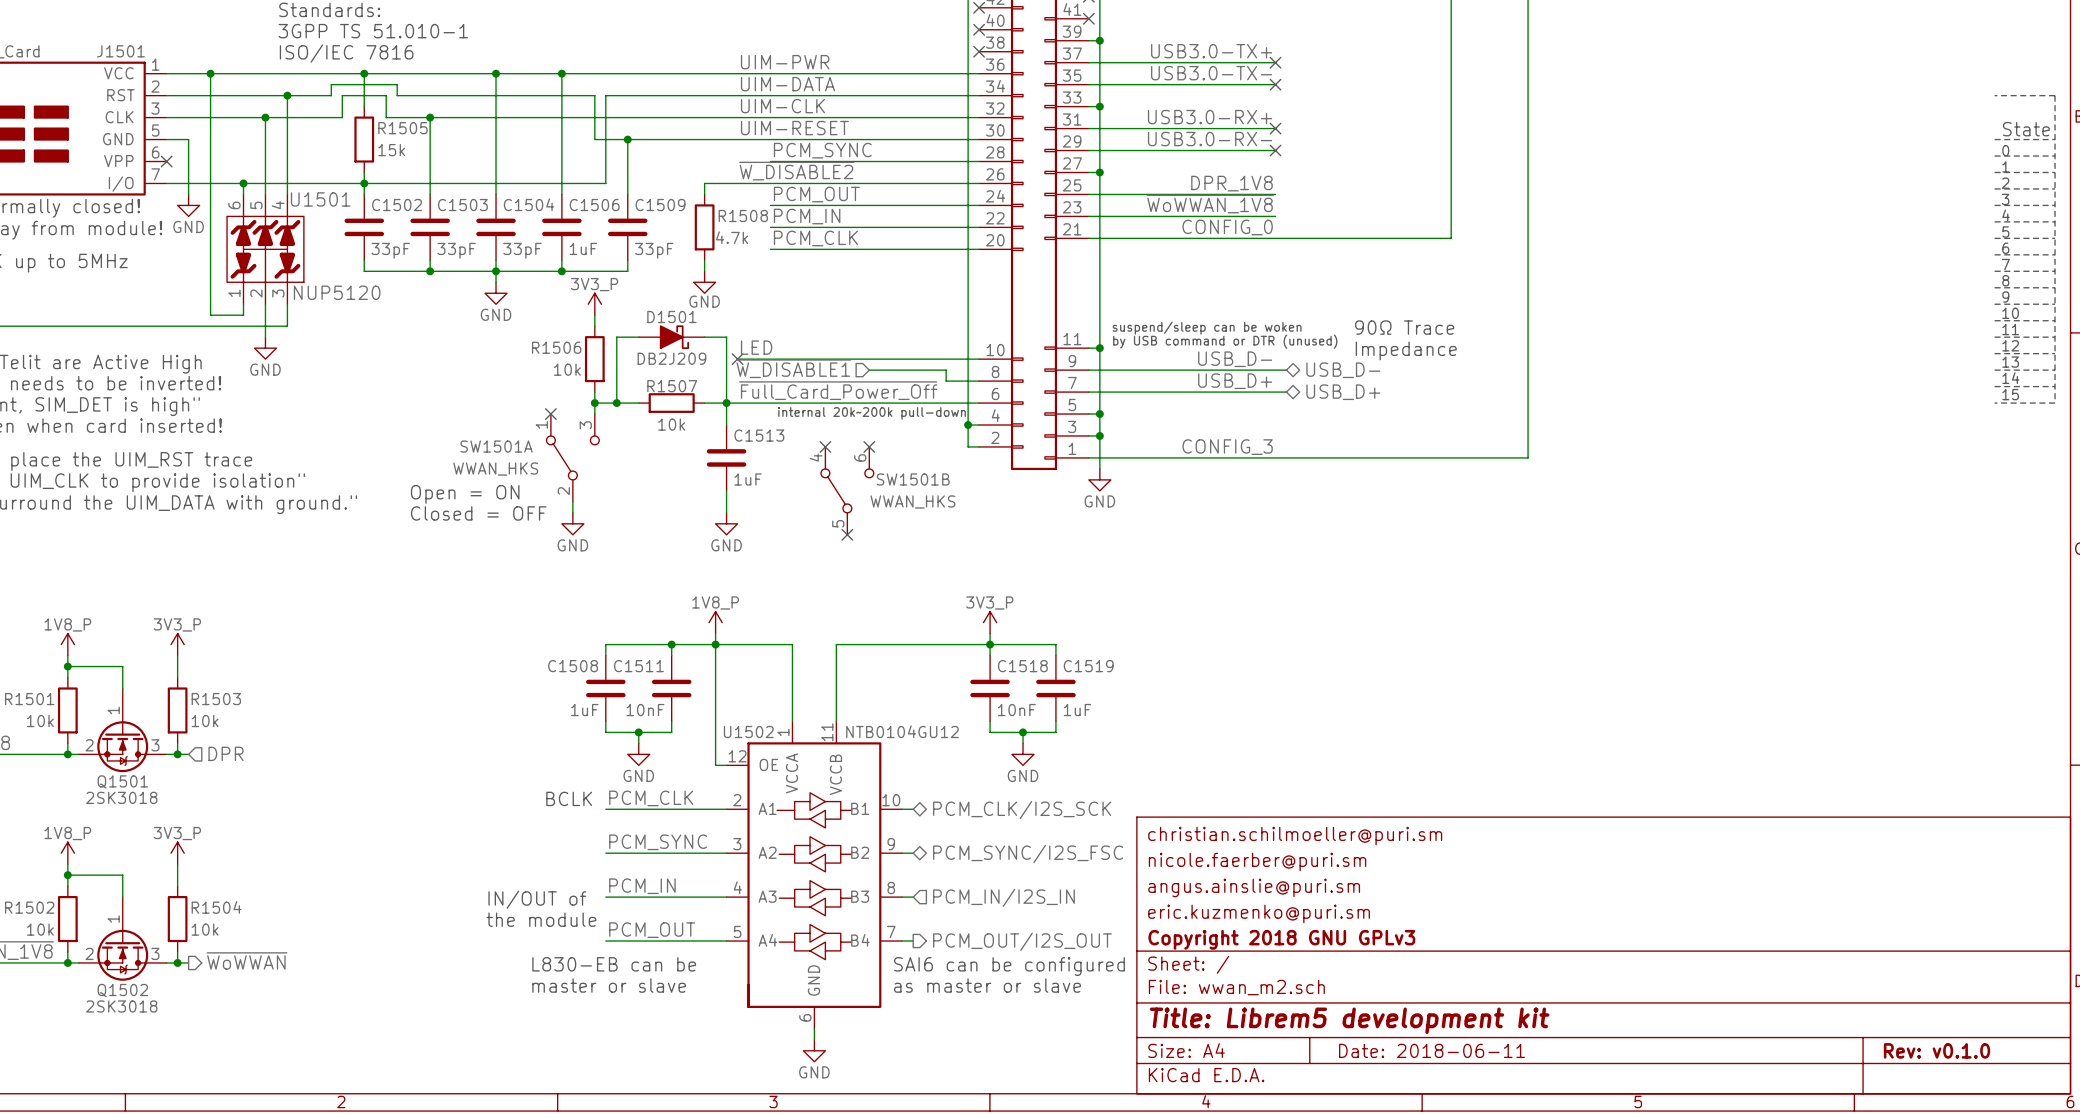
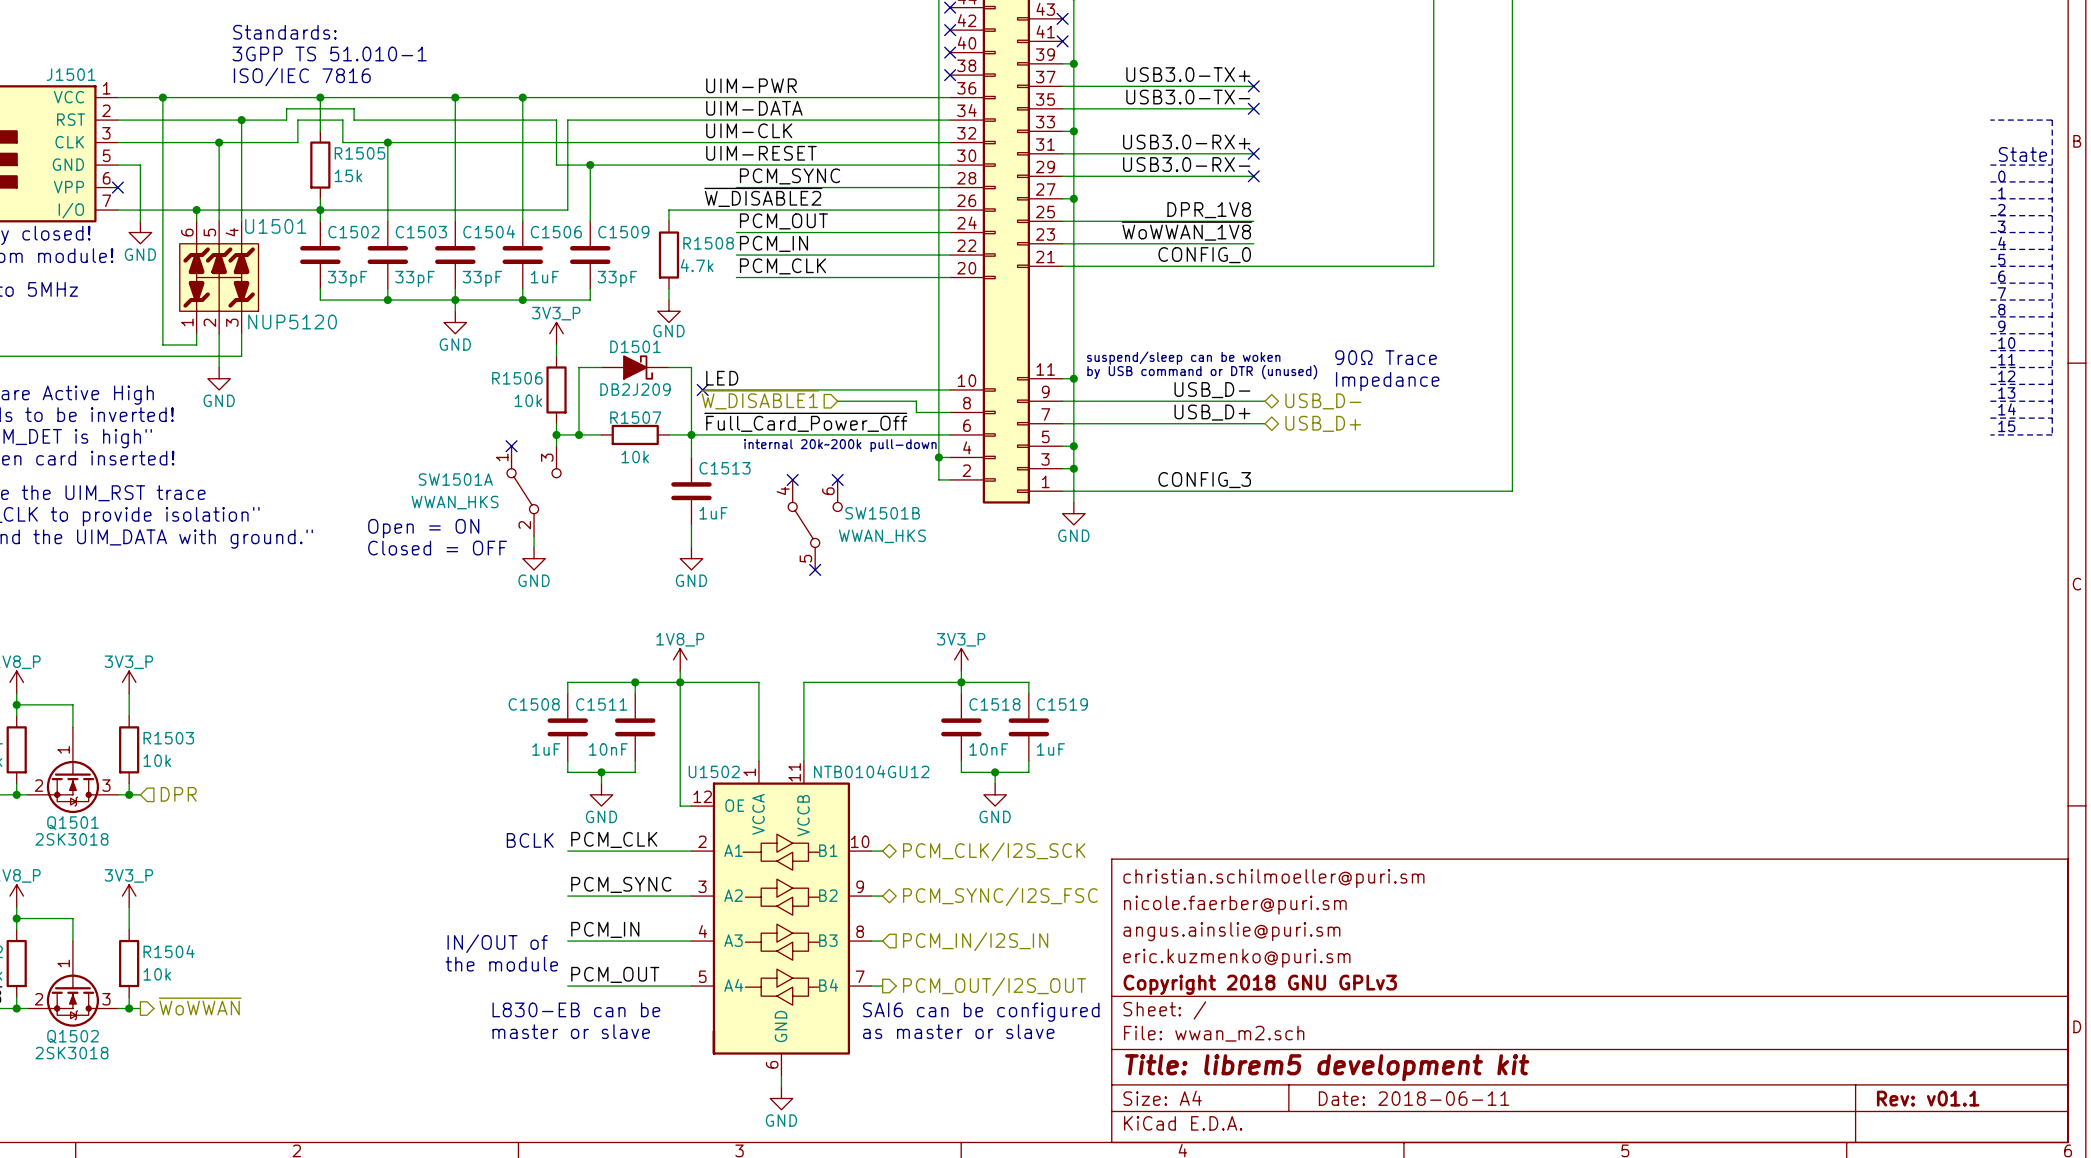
title block: Title: Librem5 development kit (1349, 1020) -> Title: librem5 development kit (1327, 1067)
title block: Rev: v0.1.0 (1936, 1050) -> Rev: v01.1 (1928, 1098)

